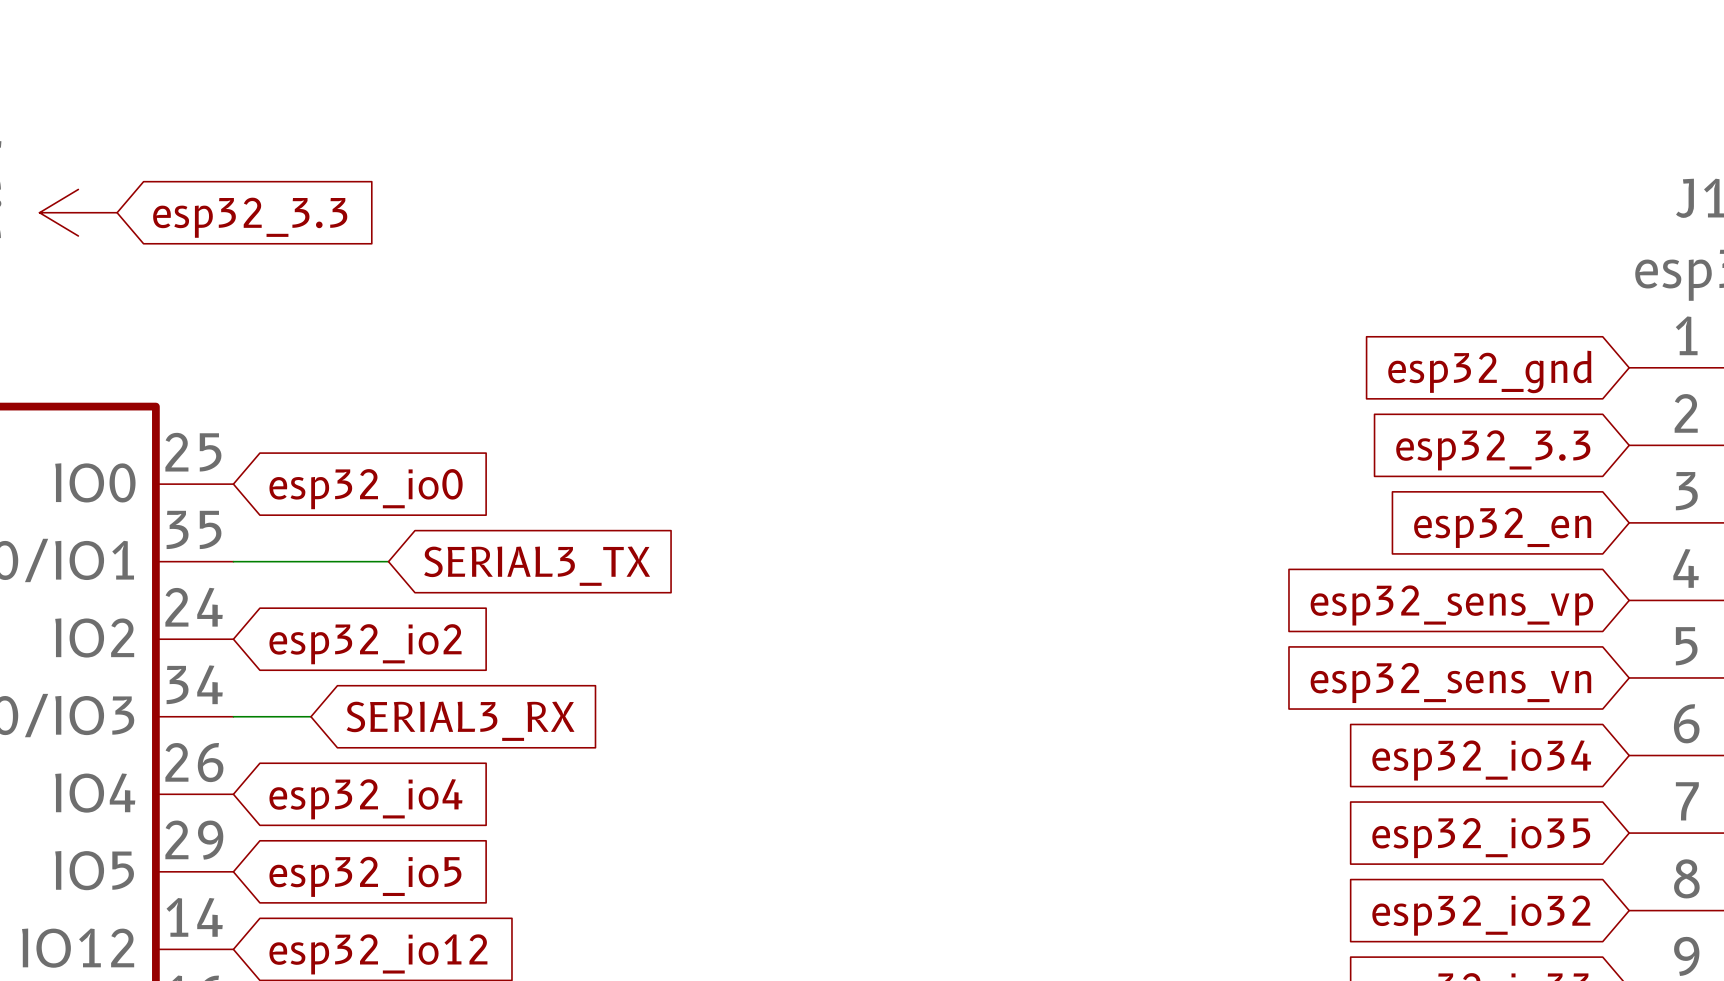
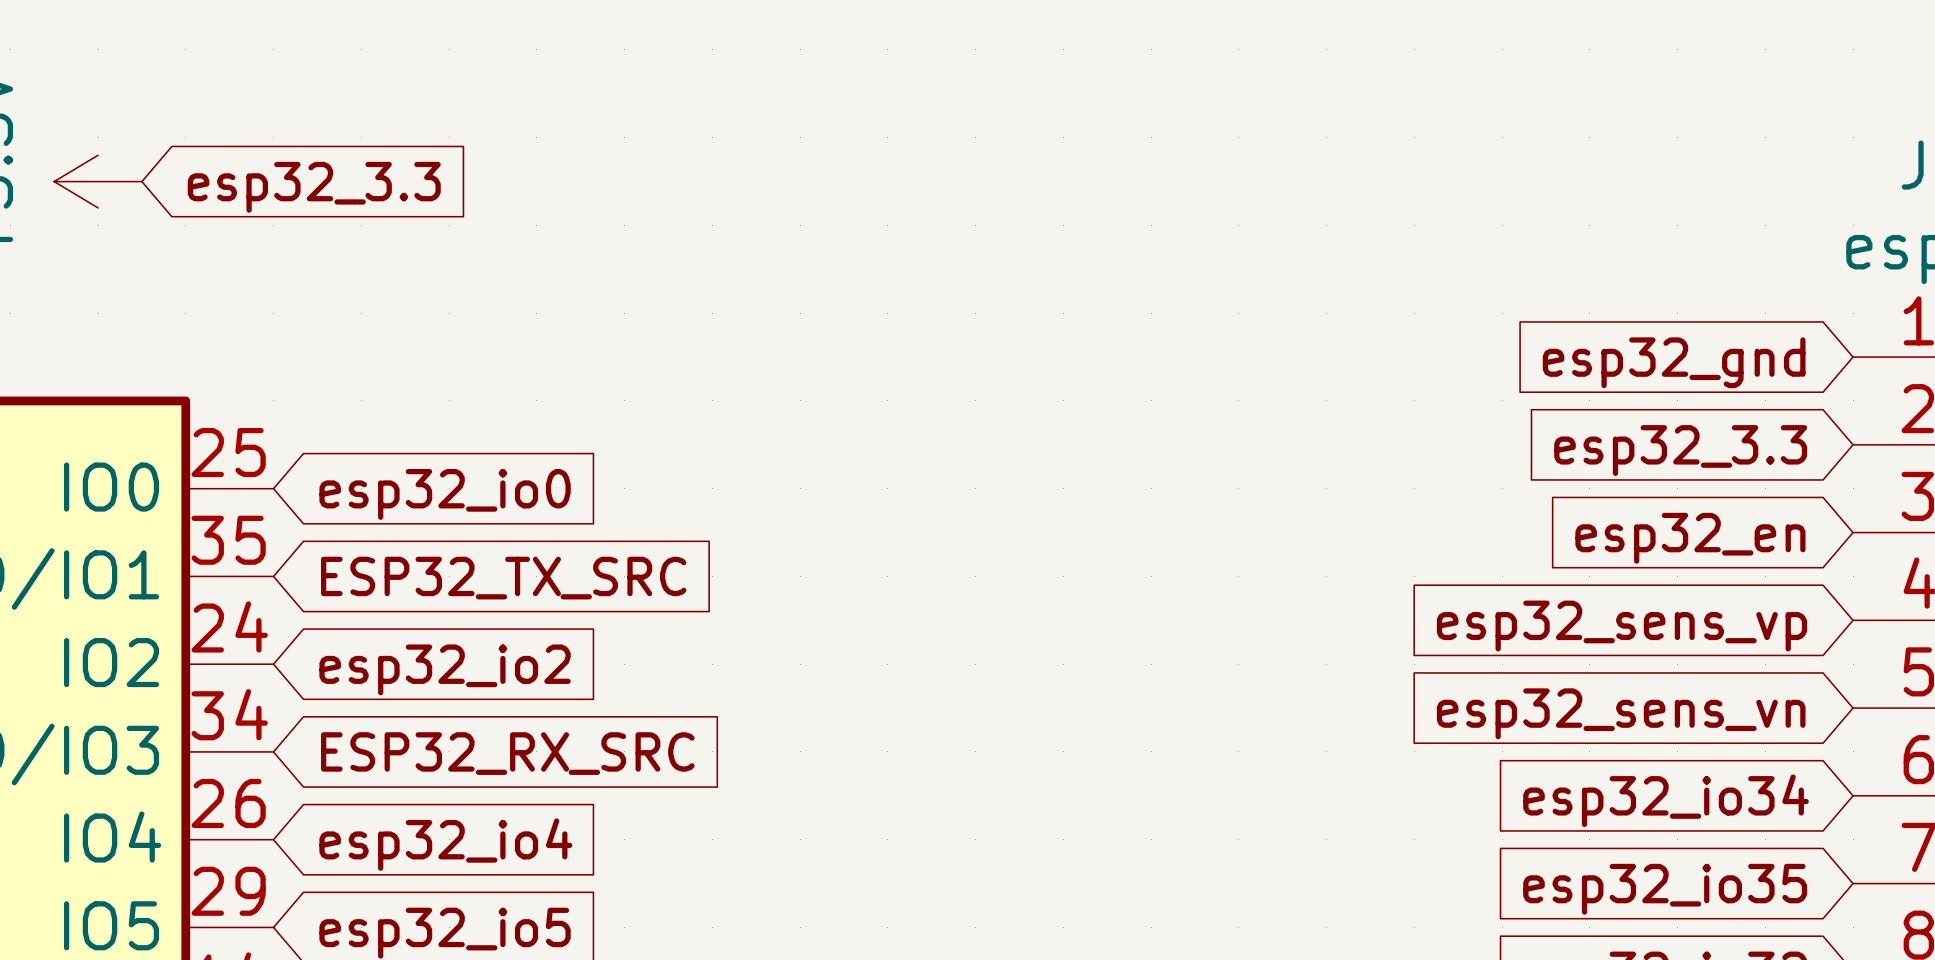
wire: (233, 561) (388, 561) -> none
global label: none -> ESP32_TX_SRC (503, 578)
global label: SERIAL3_TX (537, 566) -> none
wire: (233, 716) (310, 716) -> none
global label: none -> ESP32_RX_SRC (507, 753)
global label: SERIAL3_RX (460, 721) -> none

